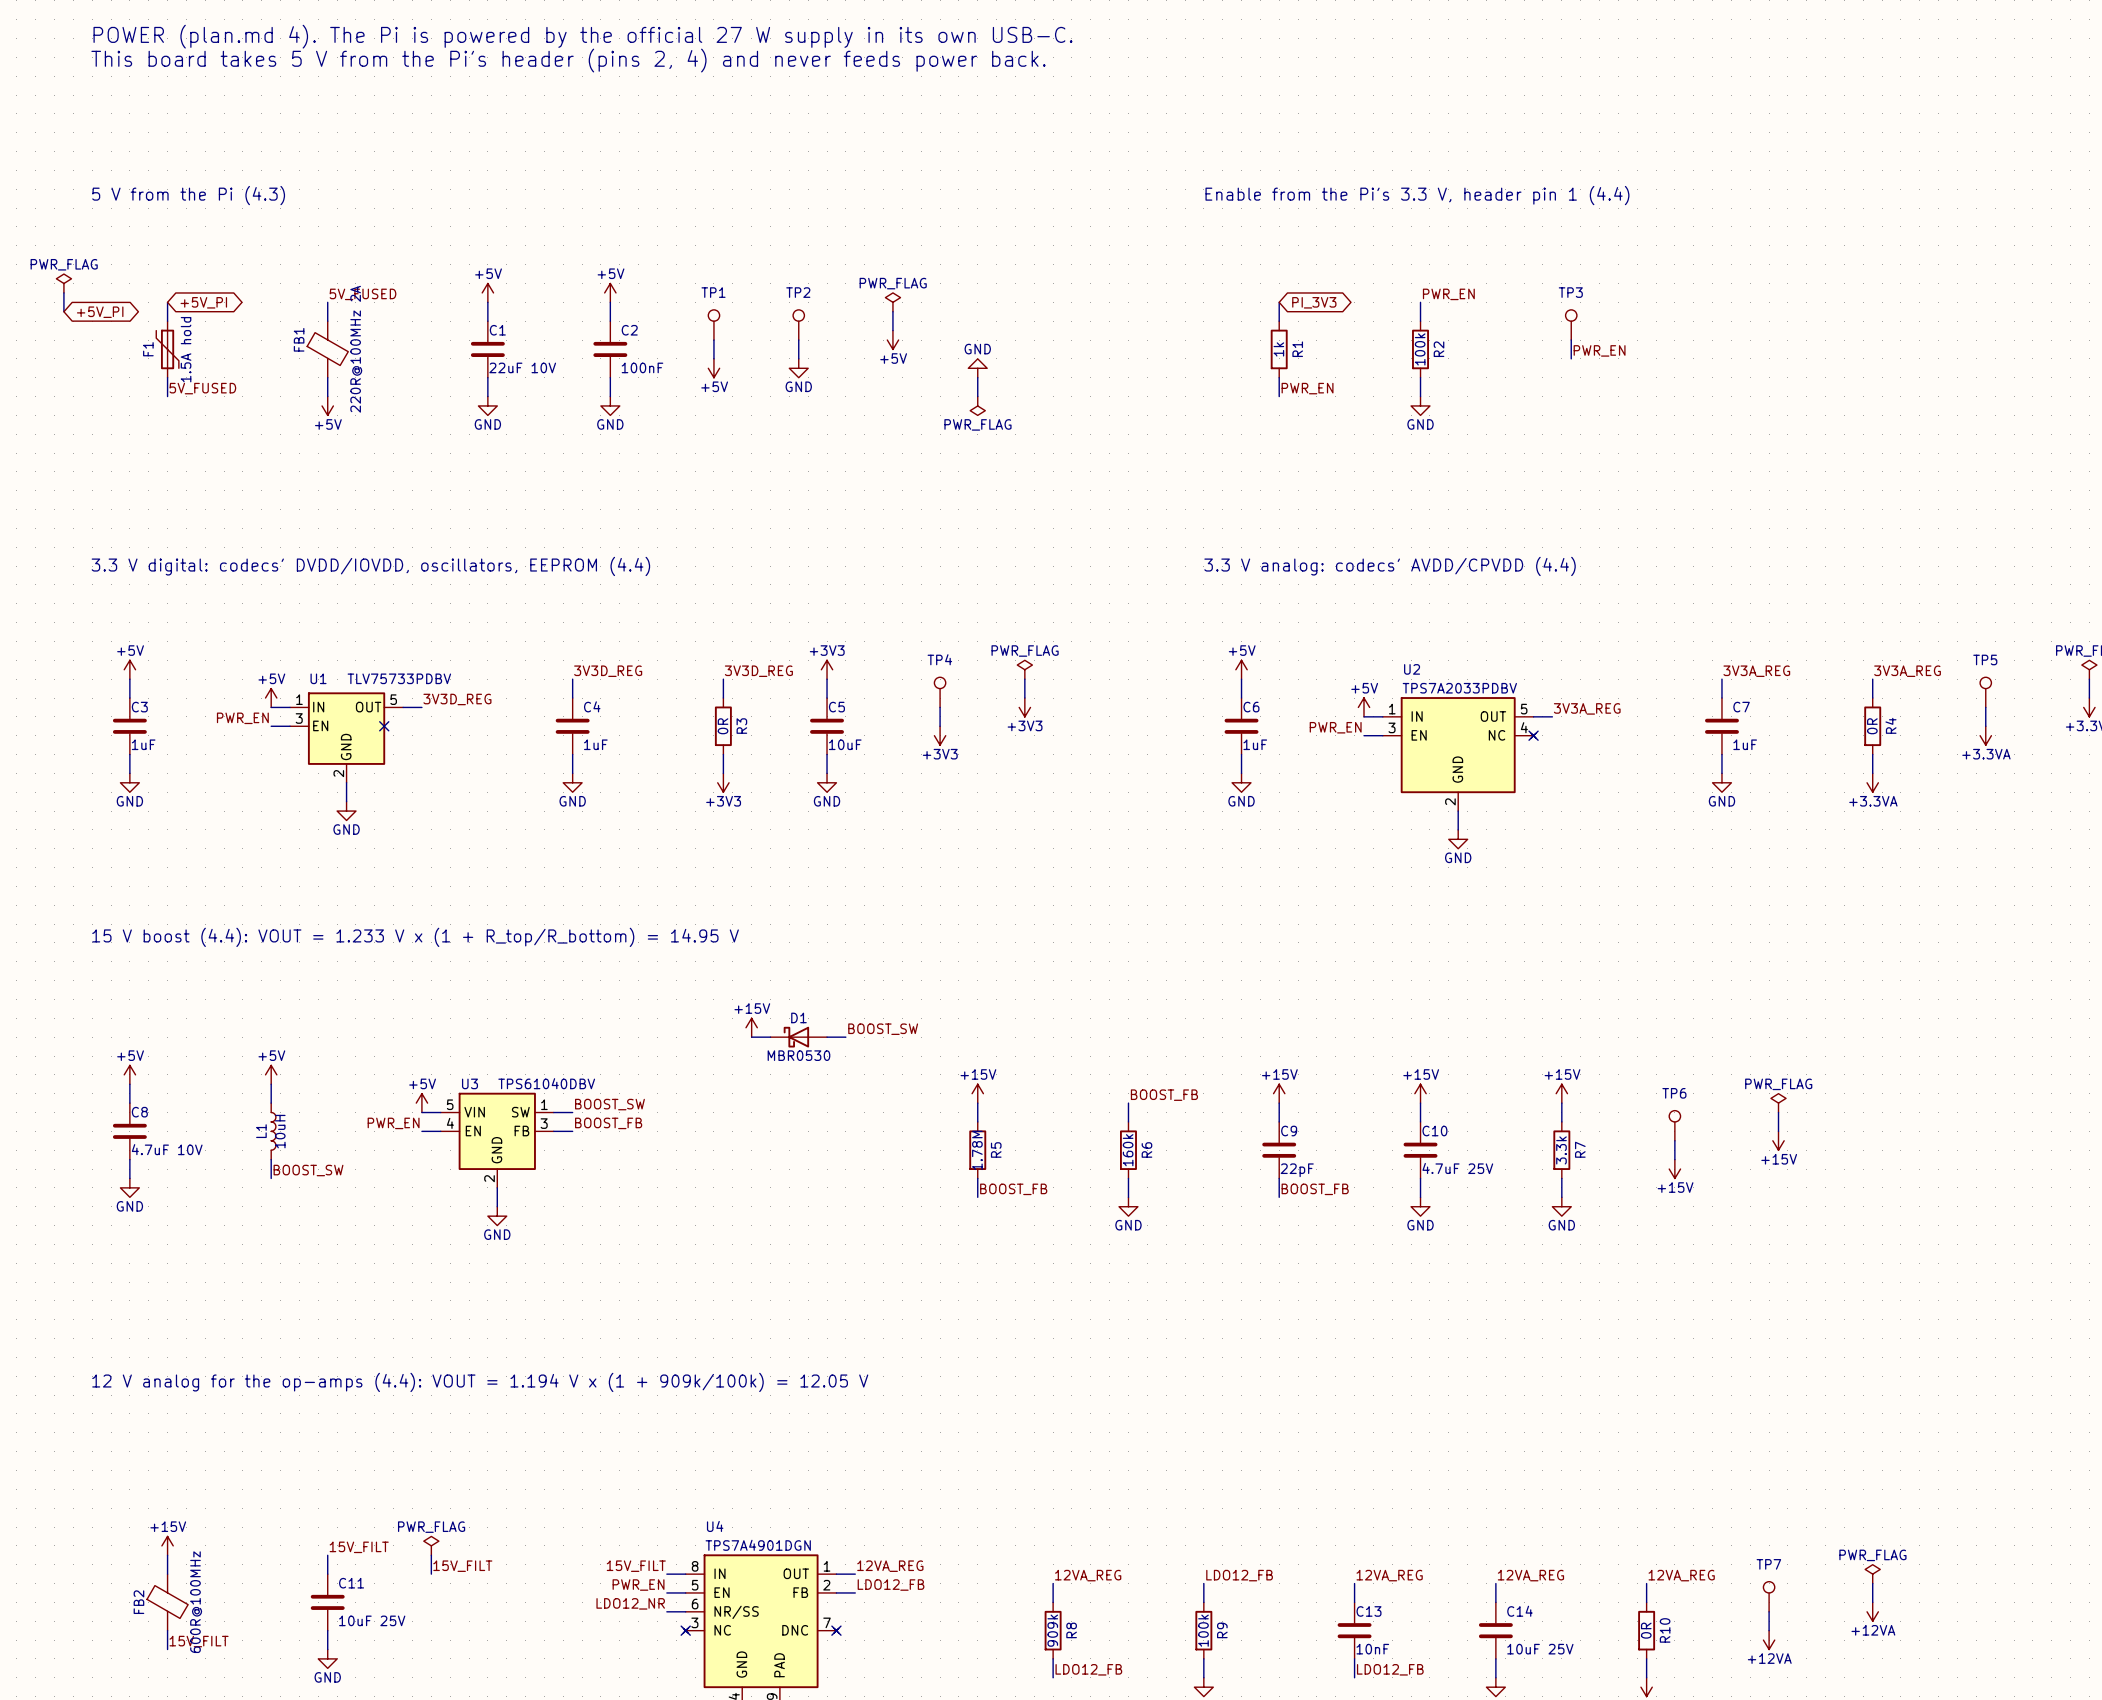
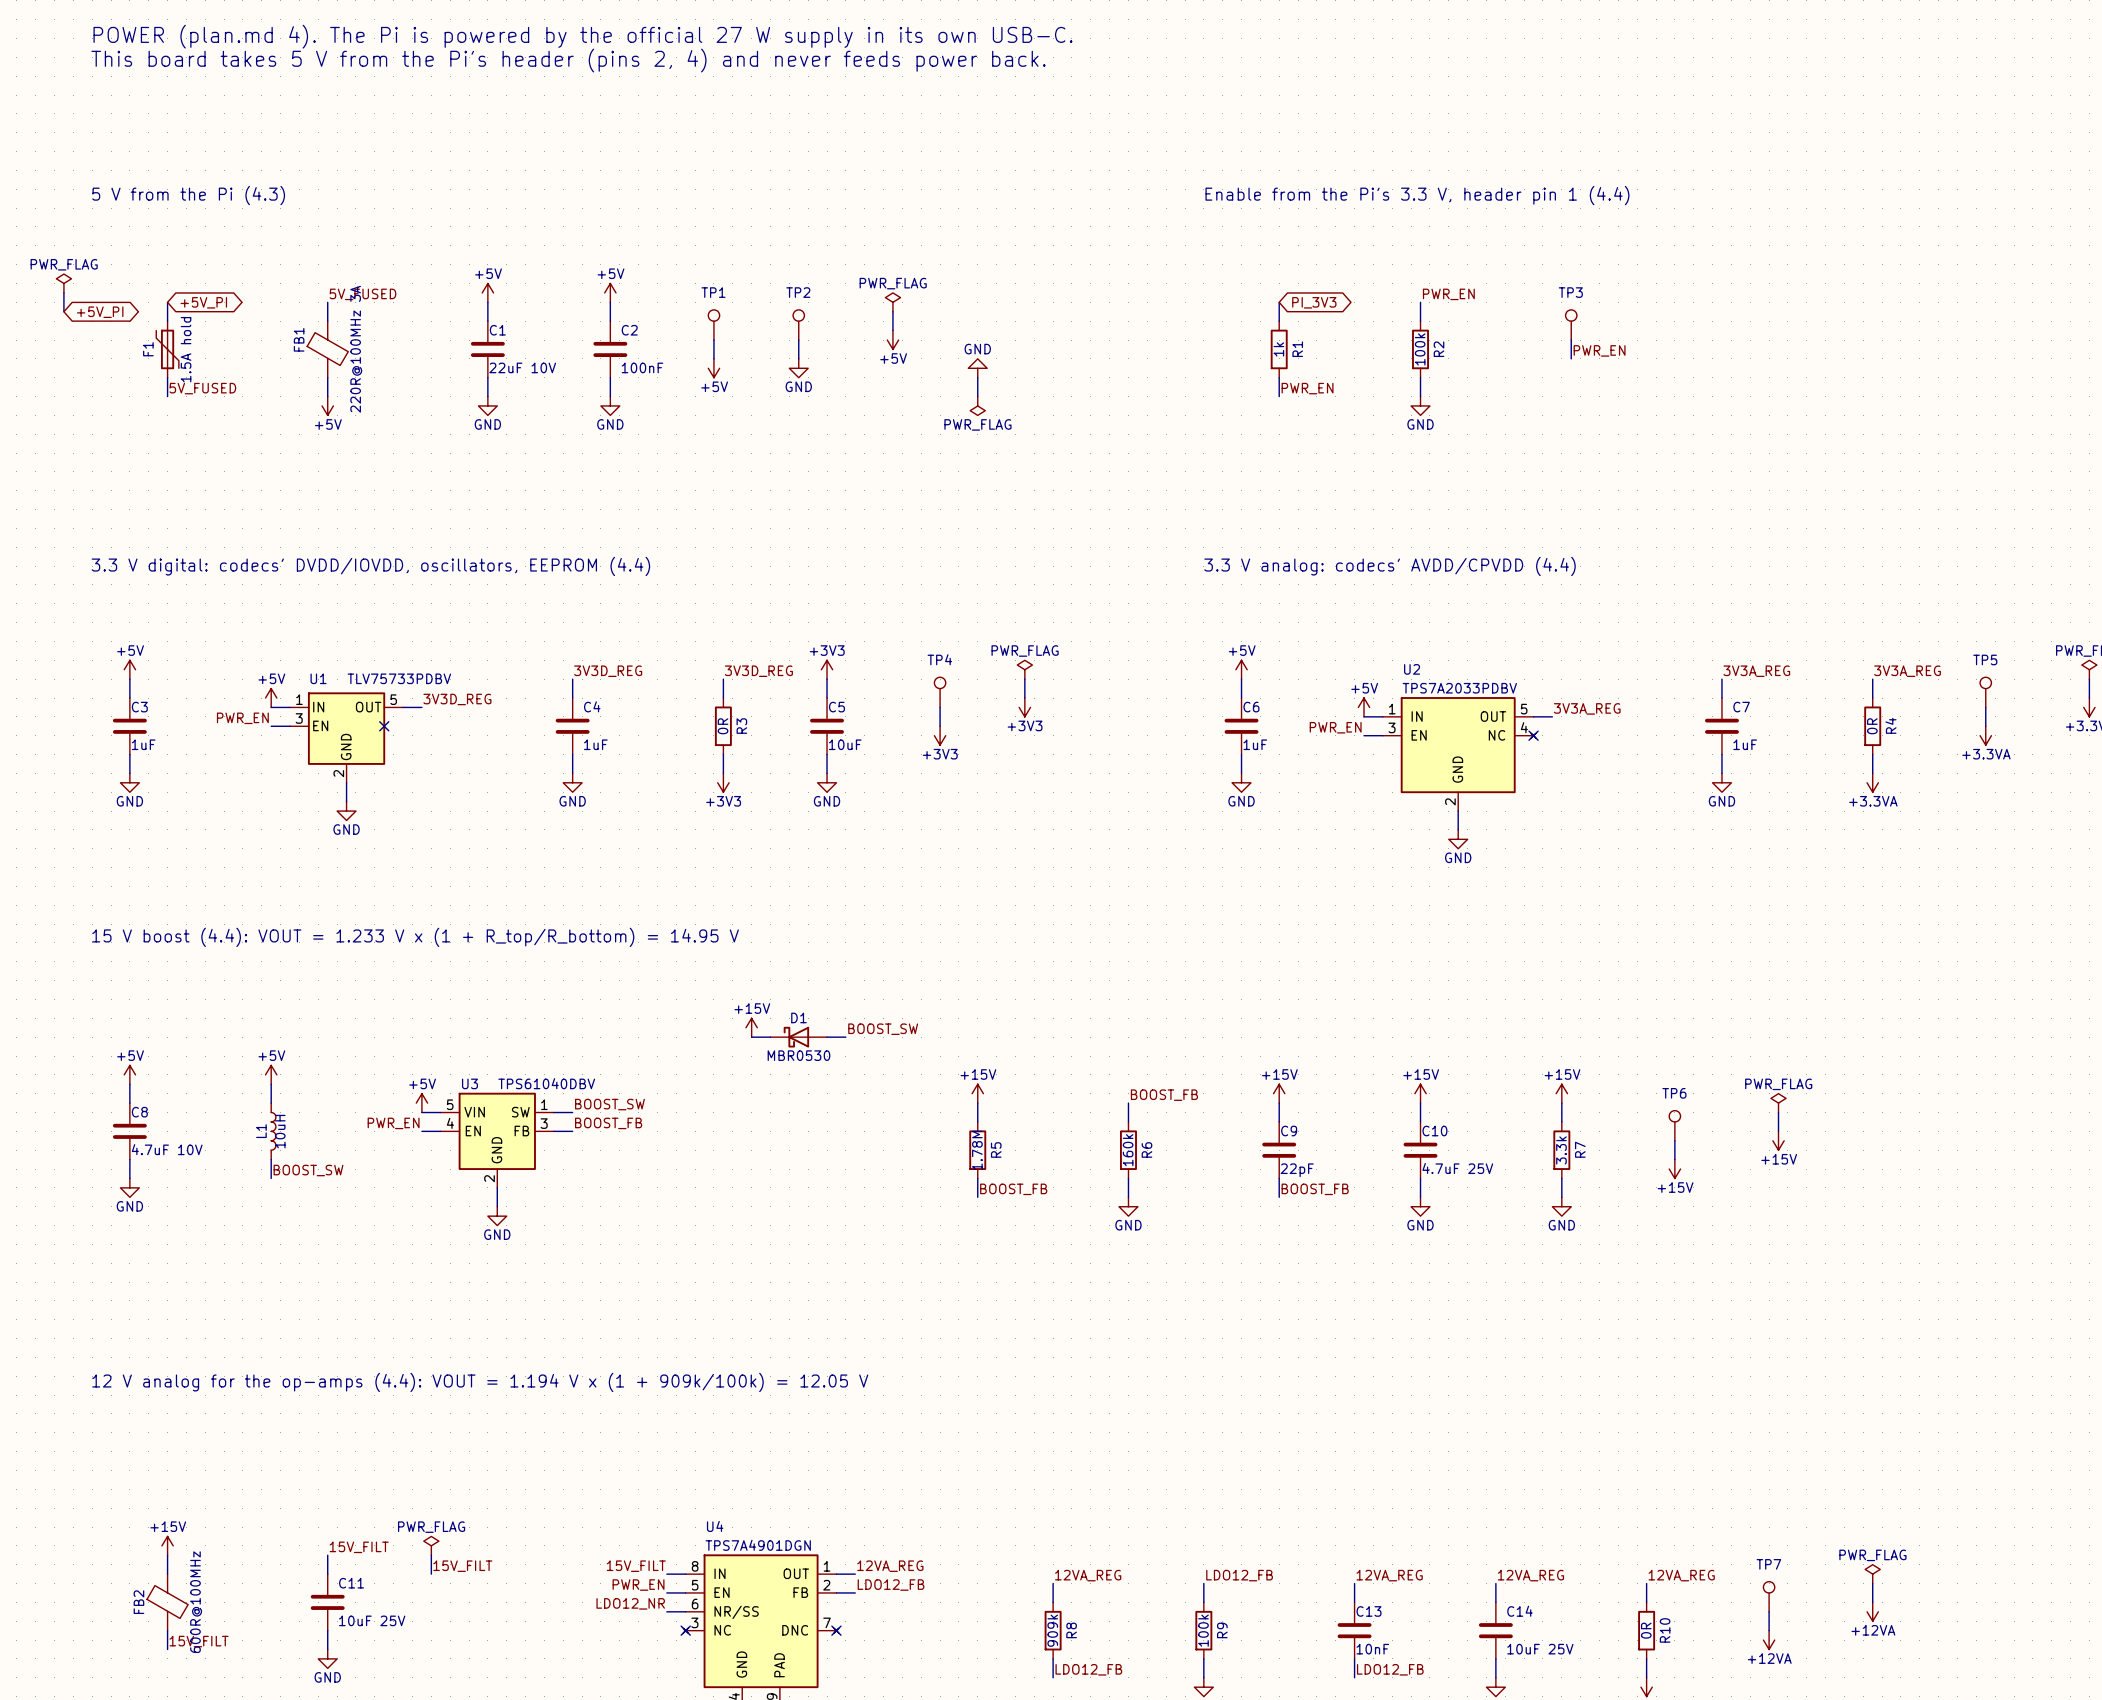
FB1 value: 220R@100MHz 2A (356, 349) -> 220R@100MHz 3A (356, 349)

